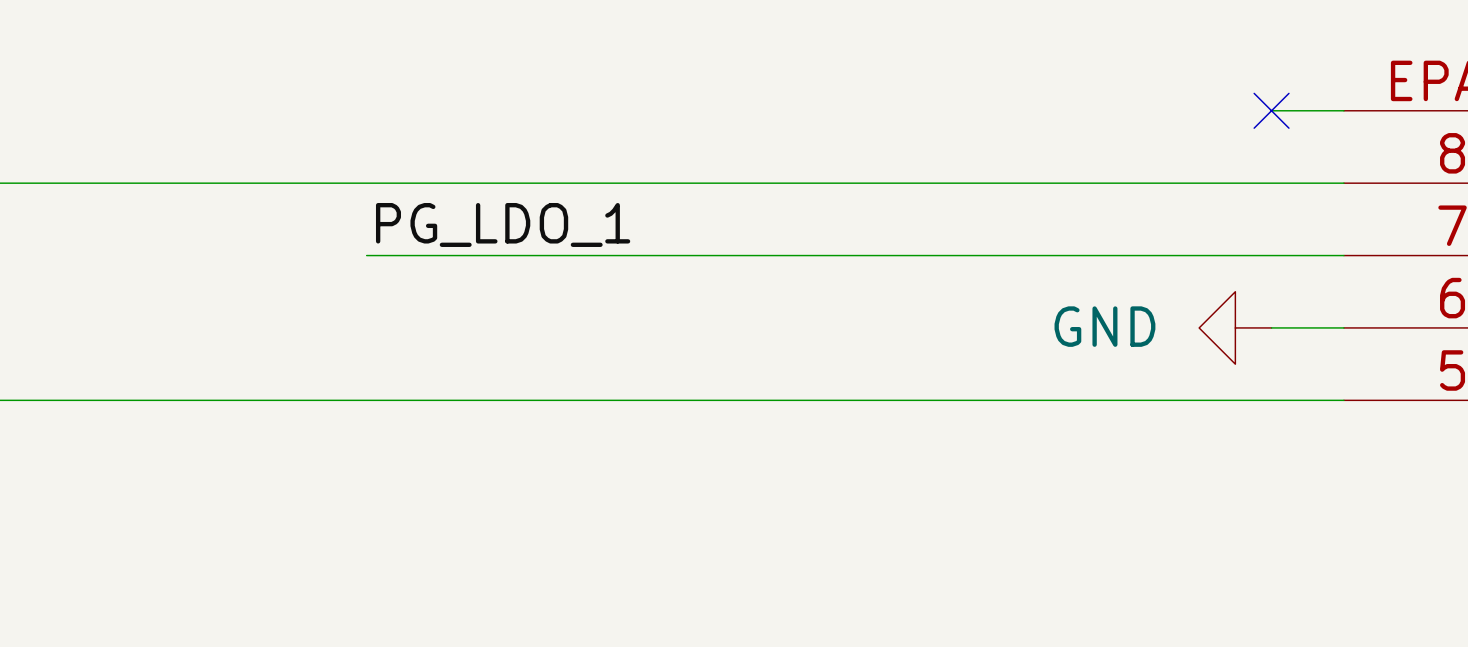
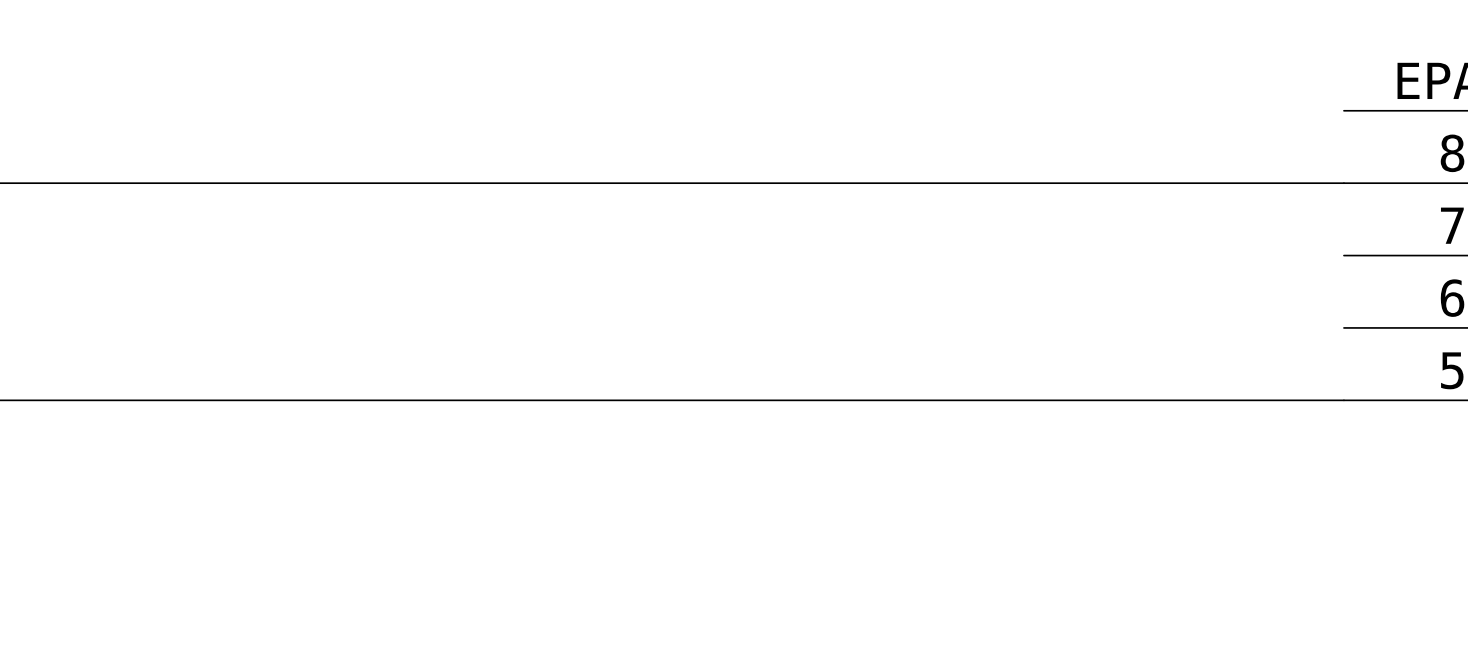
wire: (1271, 110) (1343, 110) -> none
no-connect mark: (1271, 110) -> none
label: PG_LDO_1 (503, 224) -> none
wire: (366, 255) (1343, 255) -> none
power symbol: GND (1235, 327) -> none
wire: (1271, 327) (1343, 327) -> none

